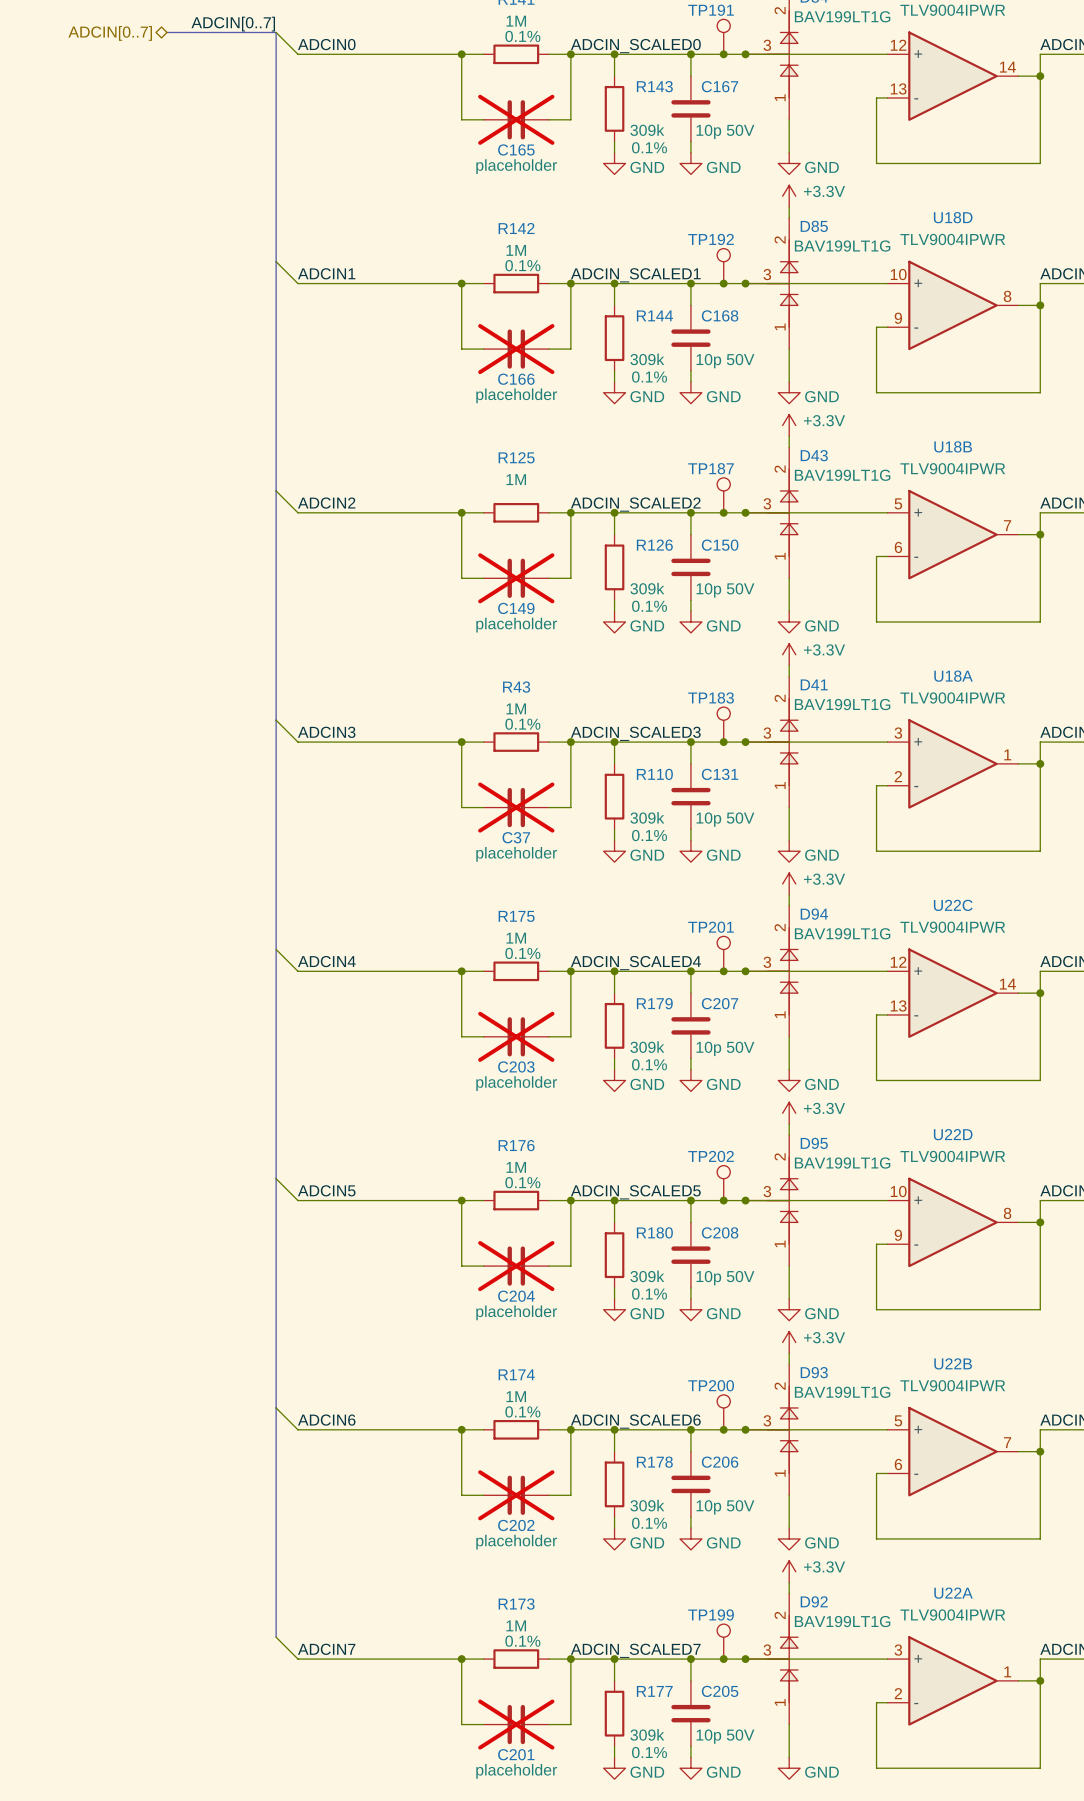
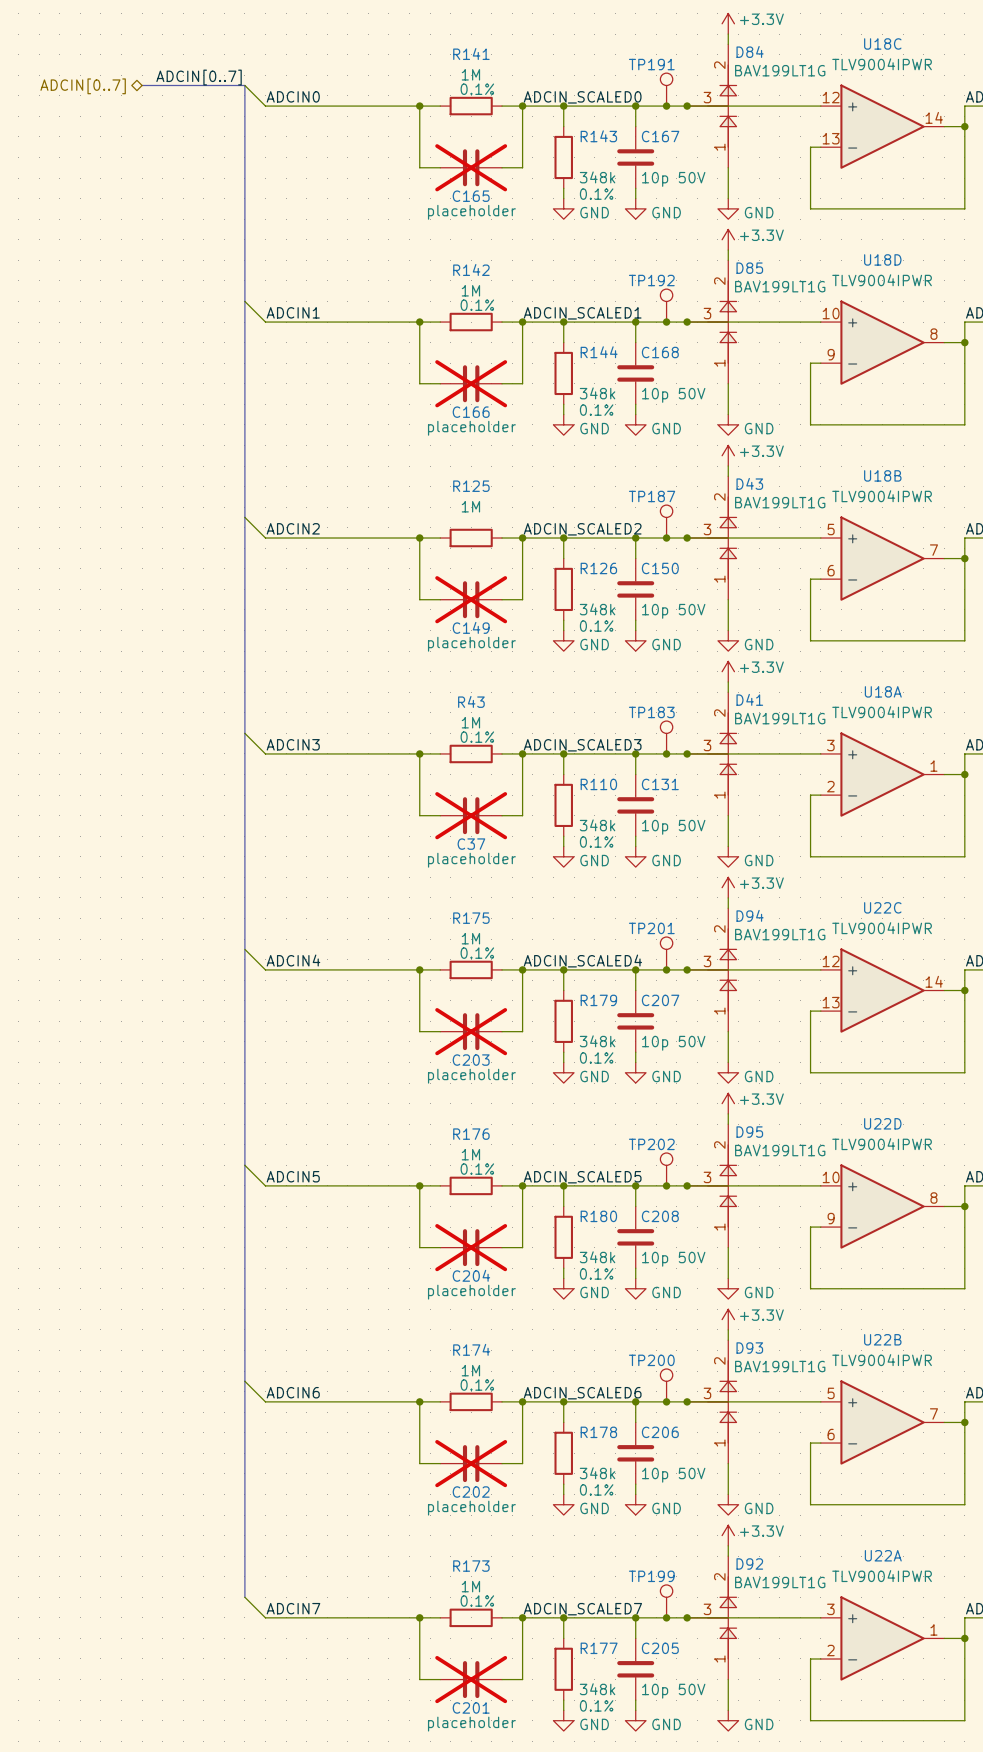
R143 value: 309k (647, 130) -> 348k (597, 177)
R144 value: 309k (647, 359) -> 348k (597, 393)
R126 value: 309k (647, 588) -> 348k (597, 609)
R110 value: 309k (647, 817) -> 348k (597, 825)
R179 value: 309k (647, 1047) -> 348k (597, 1041)
R180 value: 309k (647, 1276) -> 348k (597, 1257)
R178 value: 309k (647, 1505) -> 348k (597, 1473)
R177 value: 309k (647, 1734) -> 348k (597, 1689)

